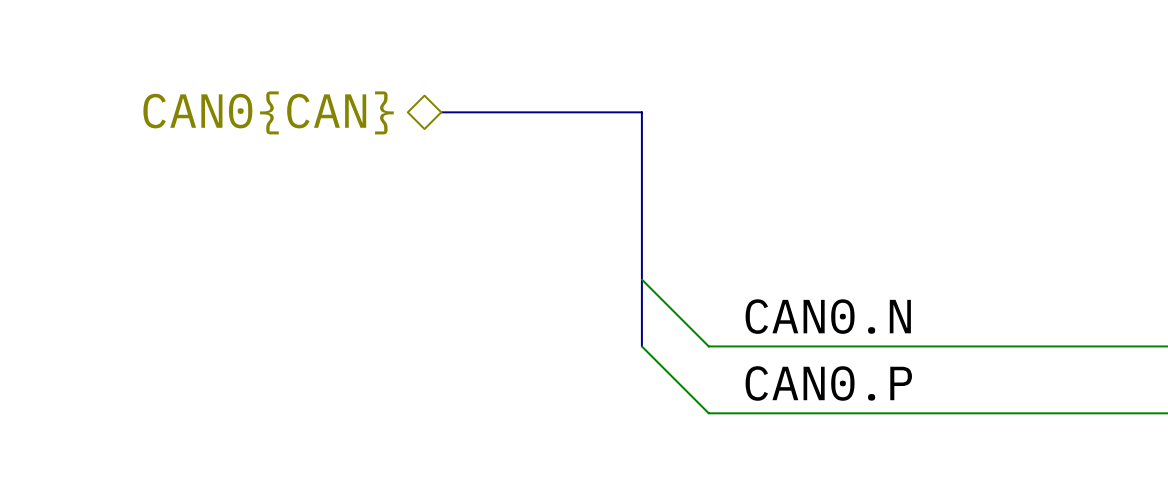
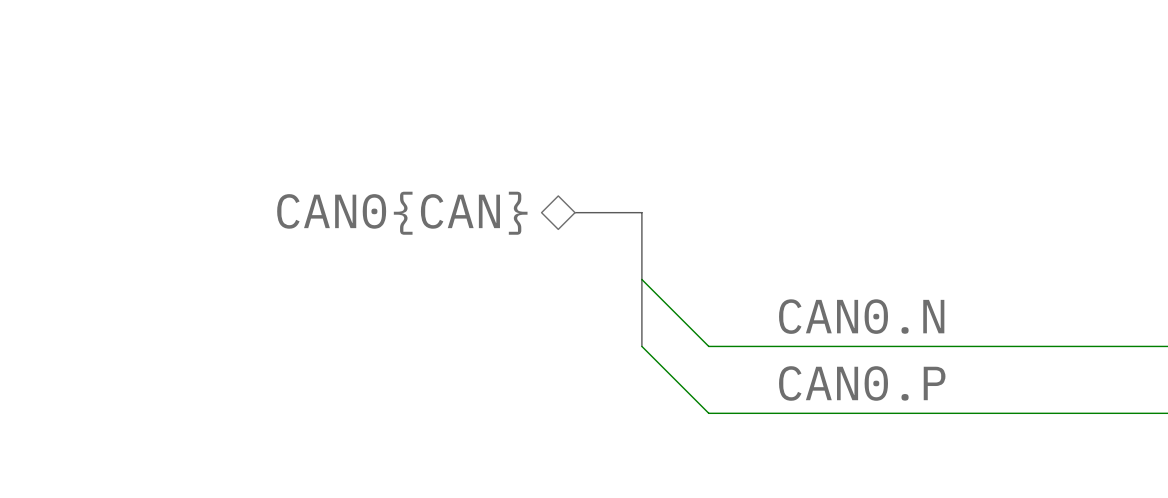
hierarchical label position: CAN0{CAN} (268, 112) -> CAN0{CAN} (402, 213)
bus: (441, 112) (641, 112) (641, 212) -> (575, 212) (641, 212)
label position: CAN0.N (828, 316) -> CAN0.N (861, 316)
label position: CAN0.P (828, 383) -> CAN0.P (862, 383)

